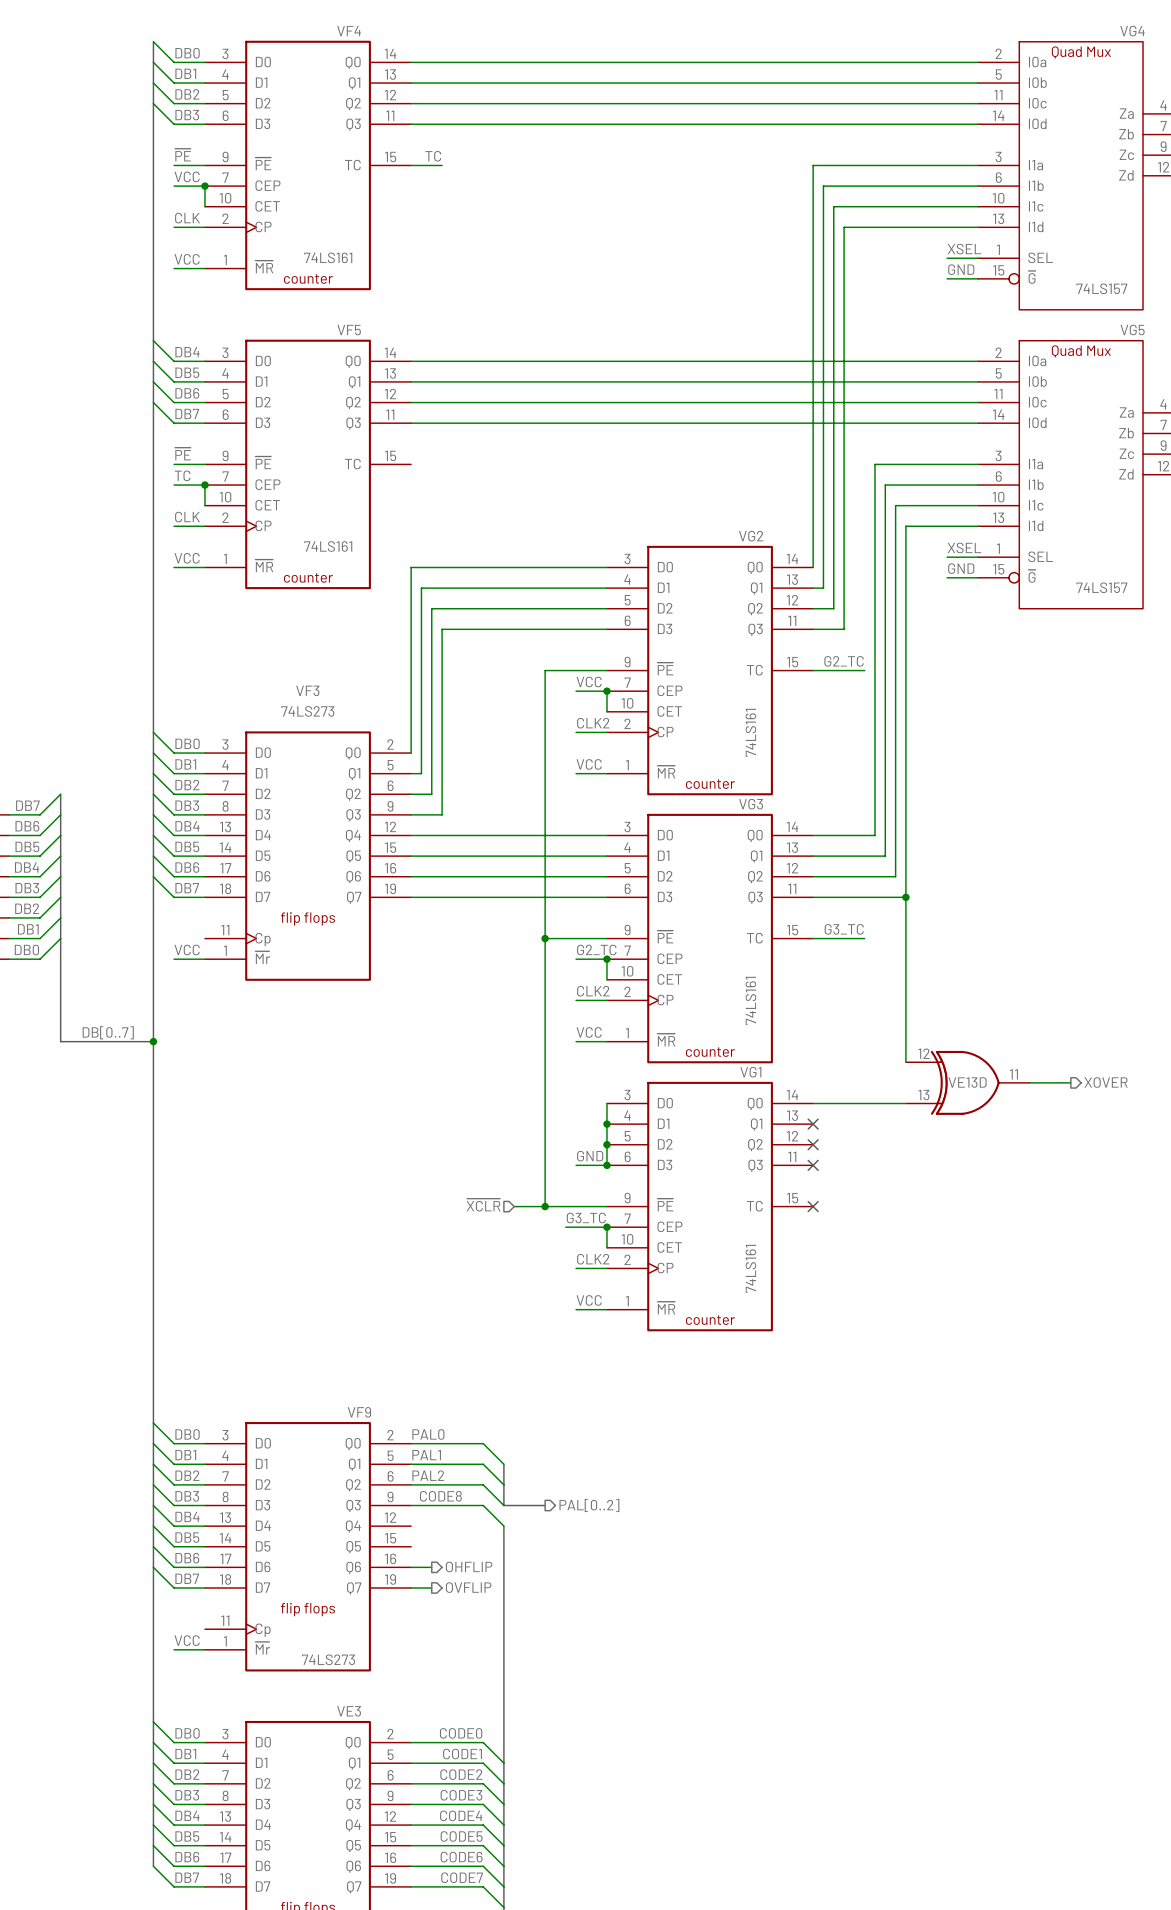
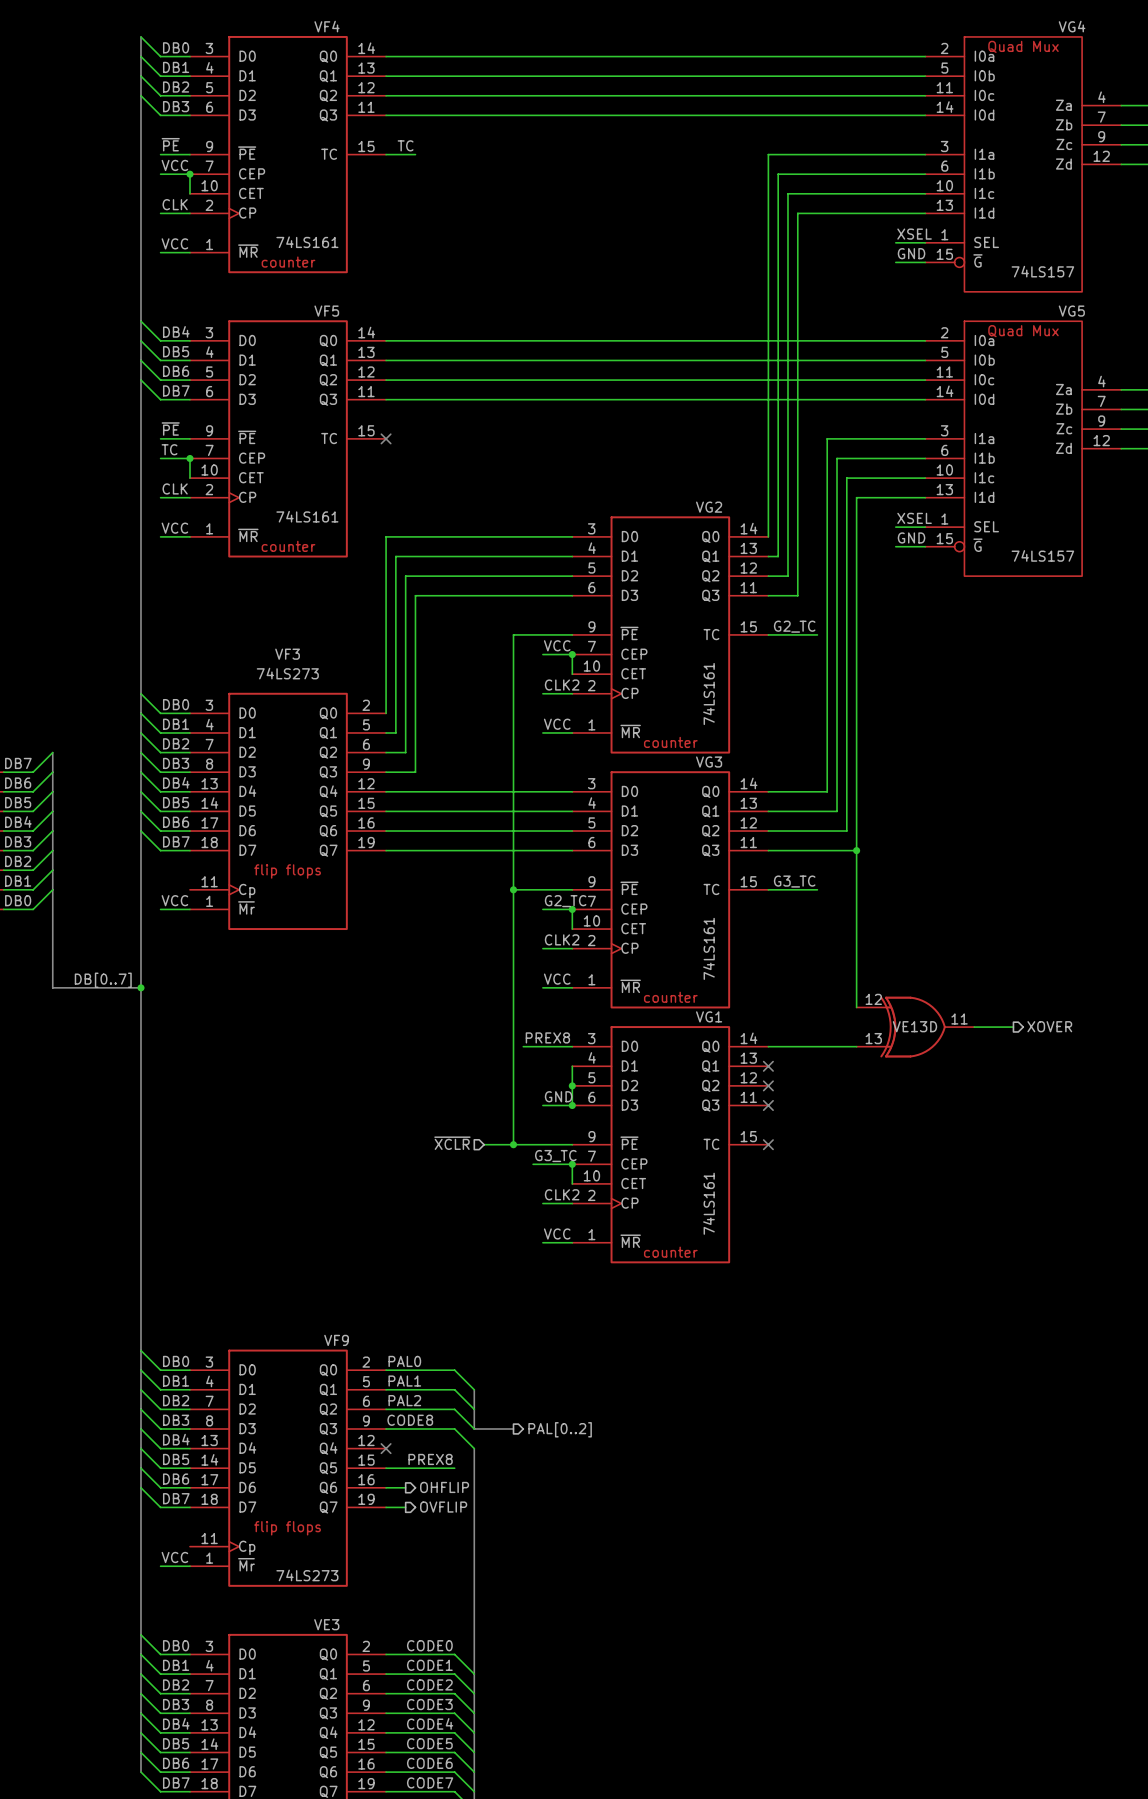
no-connect mark: none -> (386, 438)
label: none -> PREX8 (547, 1037)
wire: (606, 1103) (606, 1124) -> (572, 1046) (523, 1046)
junction: (606, 1124) -> none
no-connect mark: none -> (386, 1448)
label: none -> PREX8 (430, 1459)
wire: none -> (386, 1468) (454, 1468)

